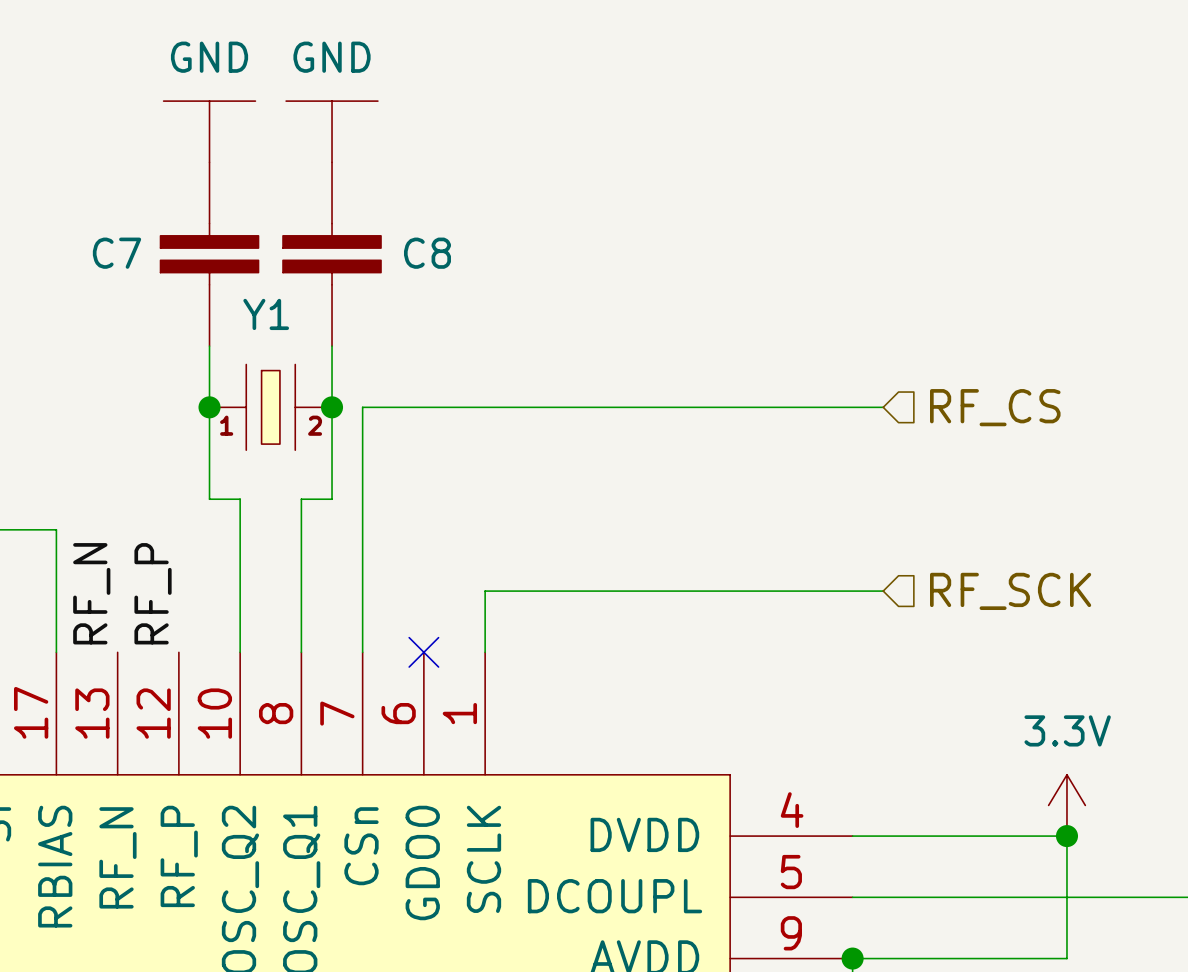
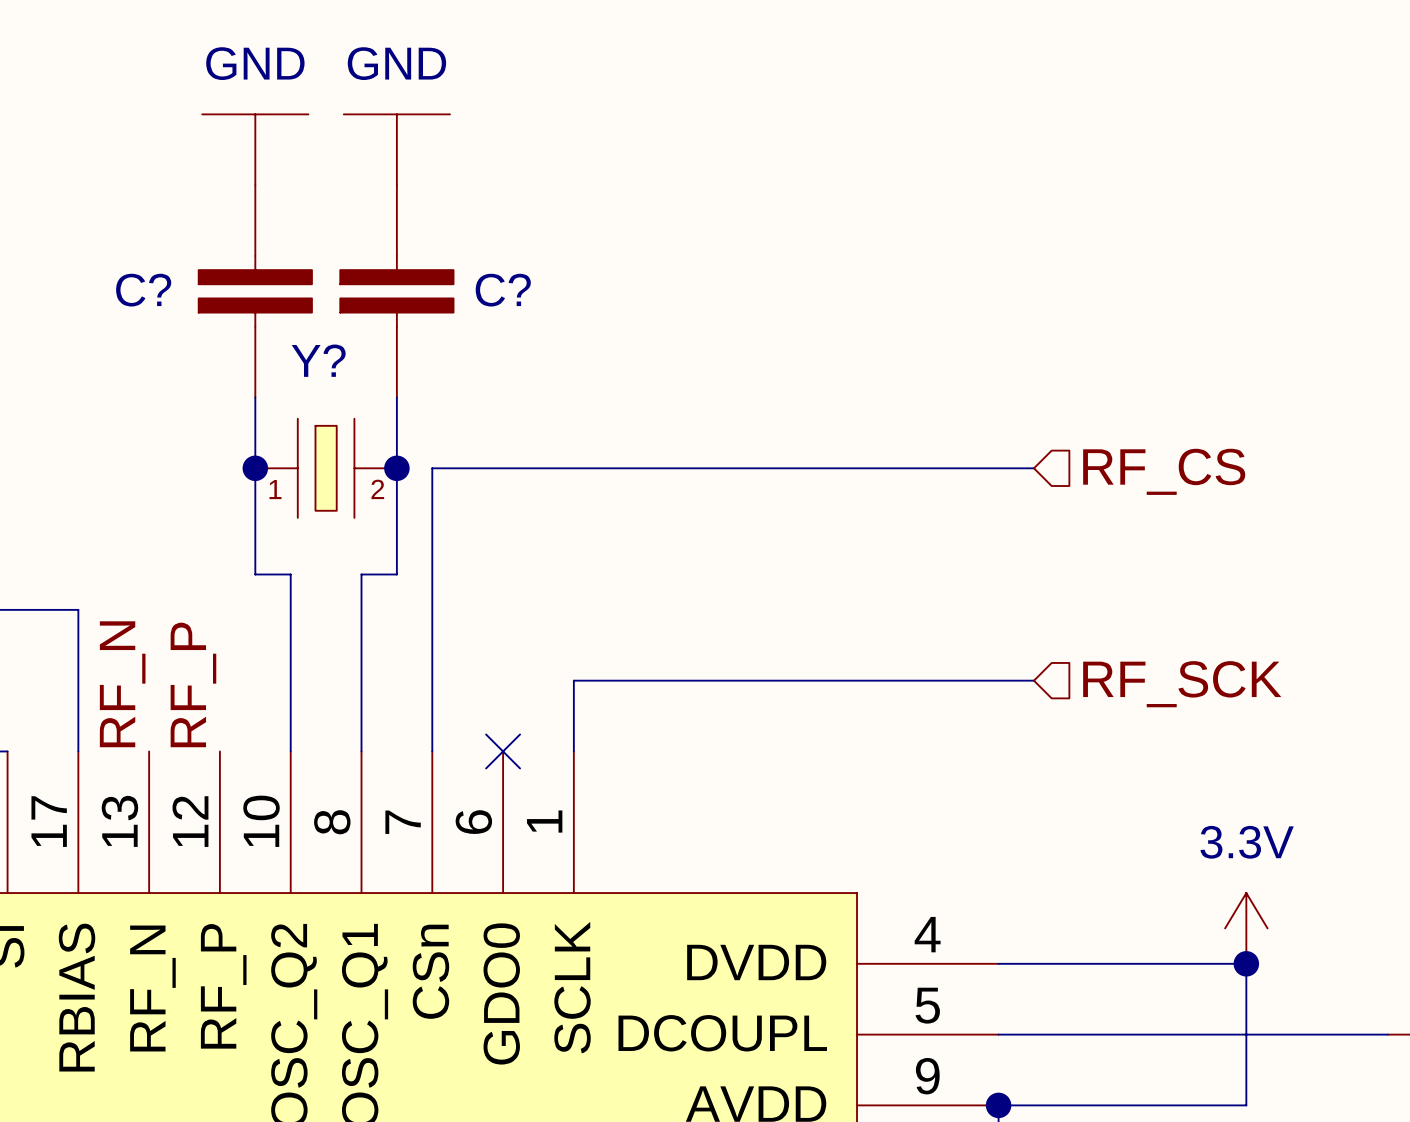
C7 name: C7 (117, 253) -> C? (143, 290)
C8 name: C8 (427, 253) -> C? (503, 290)
Y1 name: Y1 (266, 314) -> Y? (318, 360)

